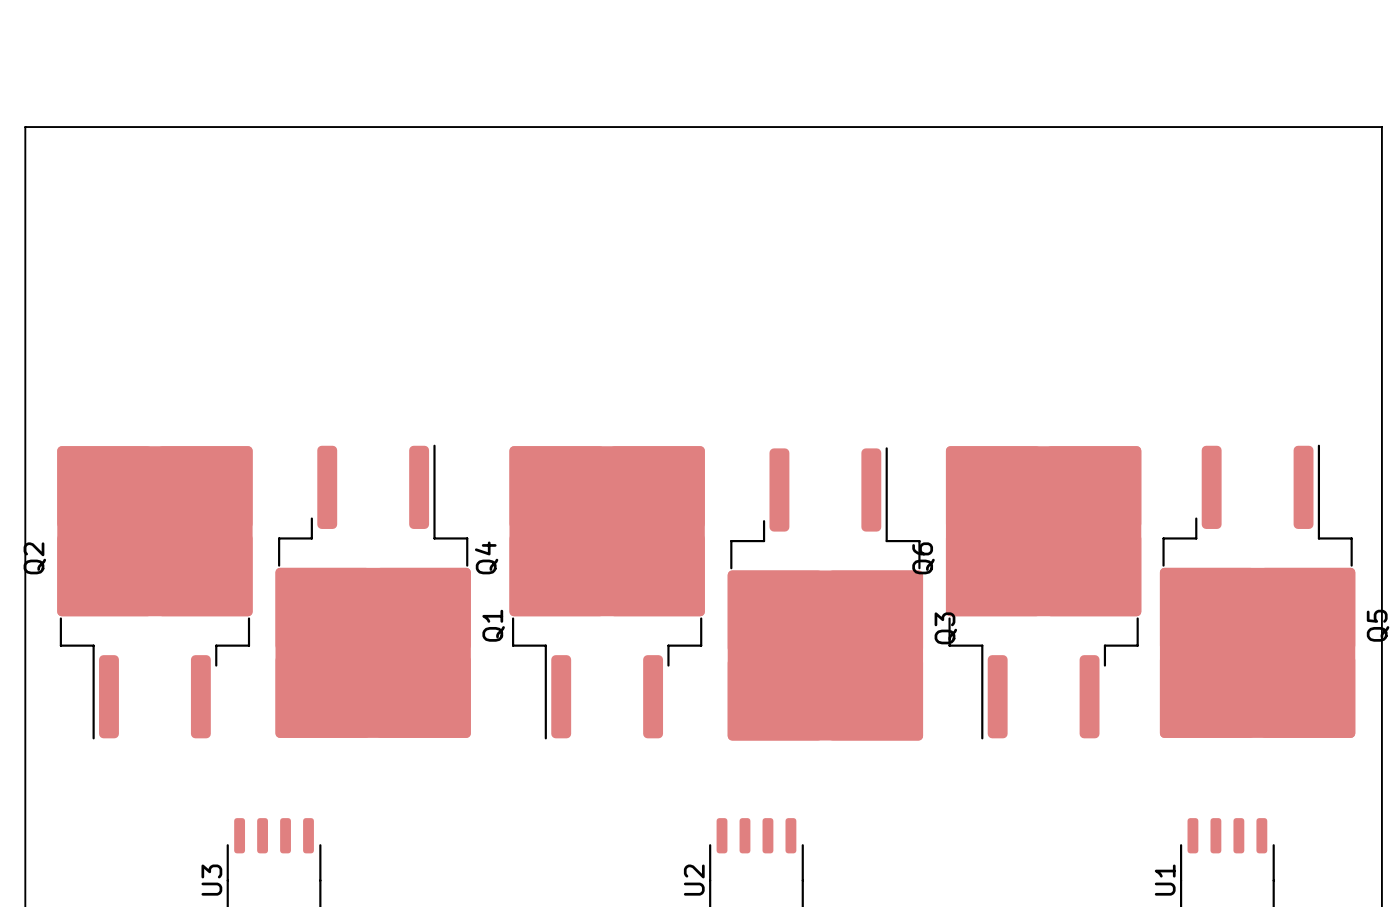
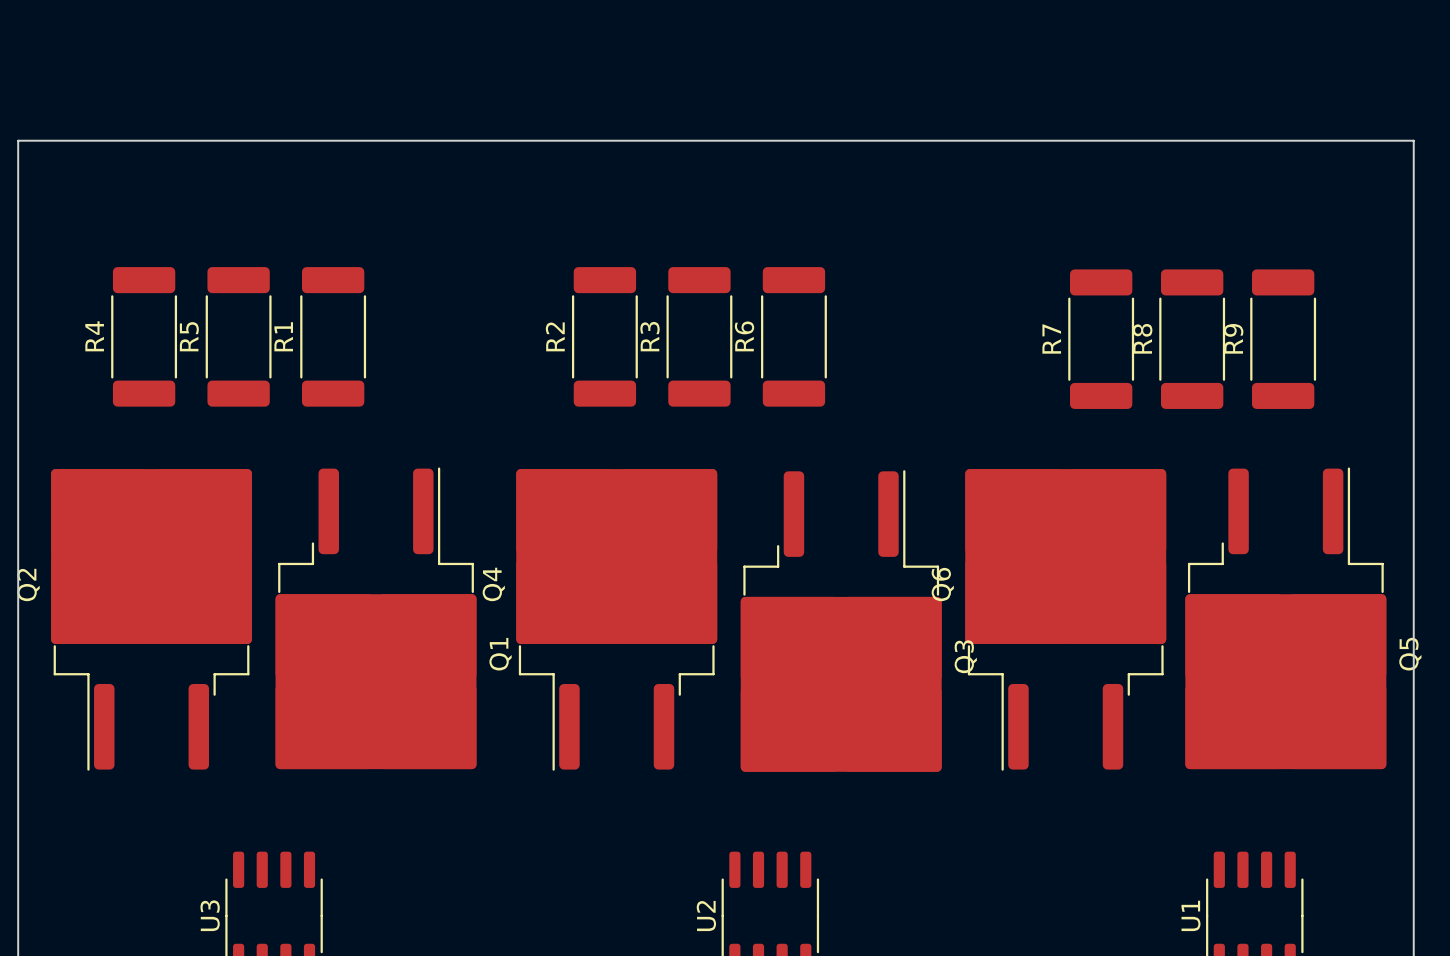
R4: none -> (144, 336)
R5: none -> (238, 336)
R1: none -> (333, 336)
R2: none -> (604, 336)
R3: none -> (699, 336)
R6: none -> (793, 336)
R7: none -> (1101, 339)
R8: none -> (1192, 339)
R9: none -> (1283, 339)

